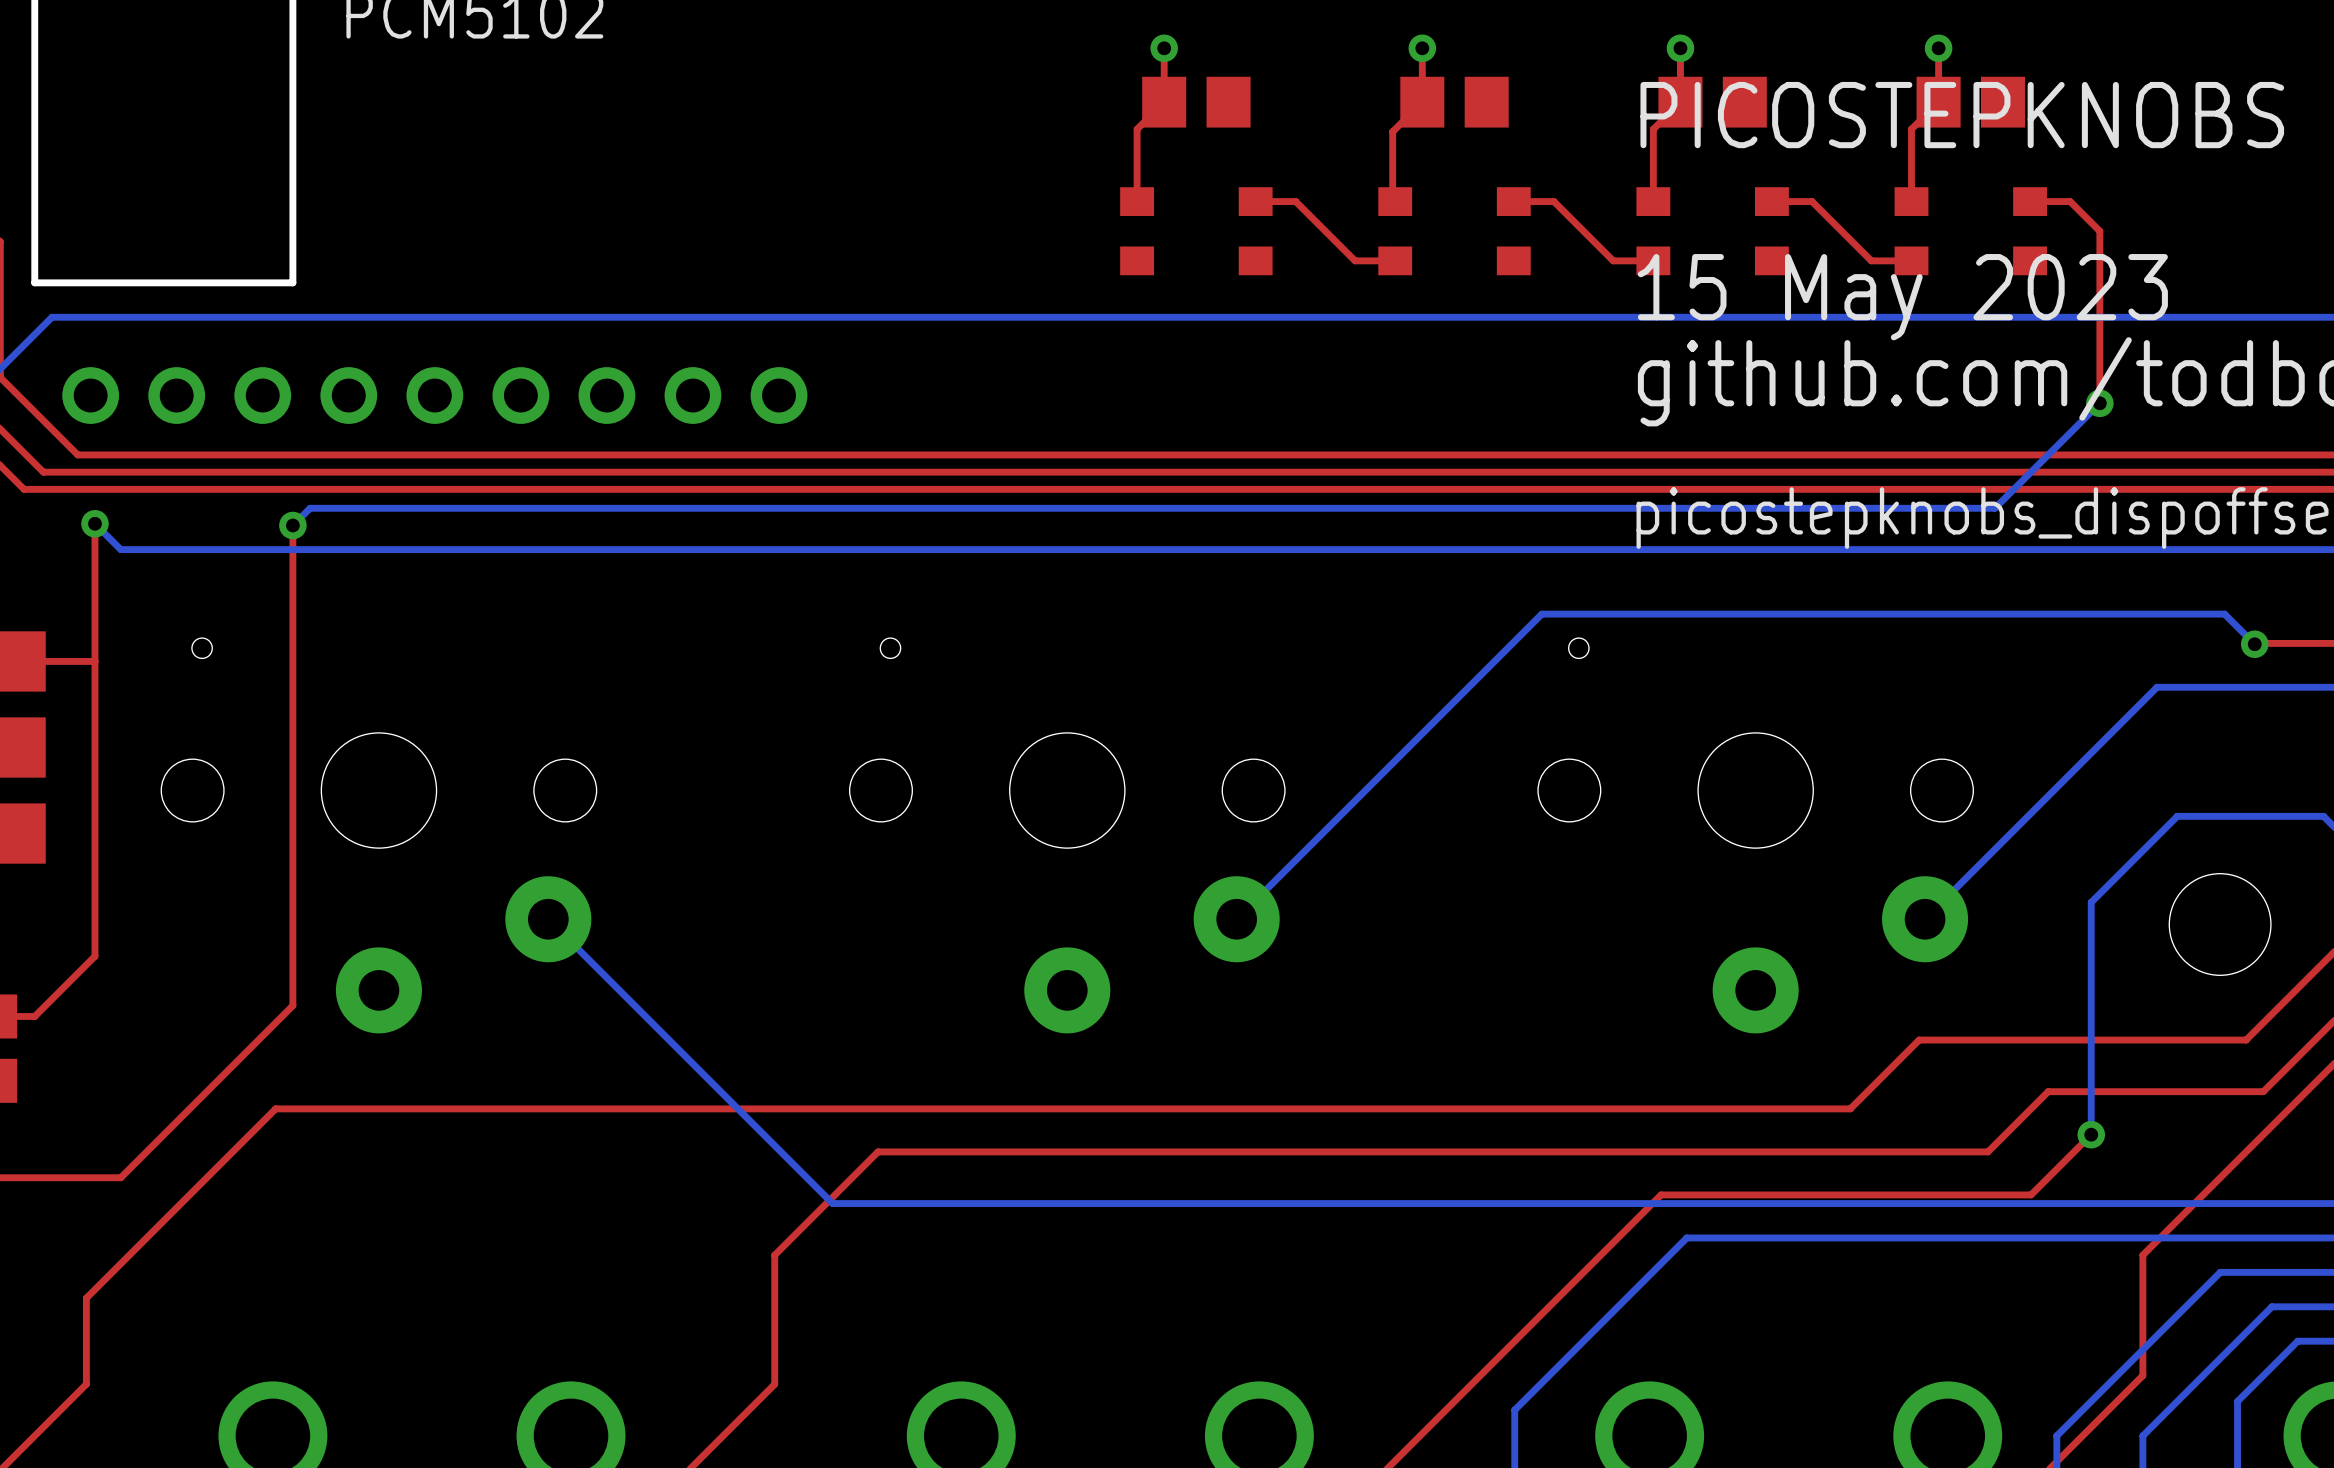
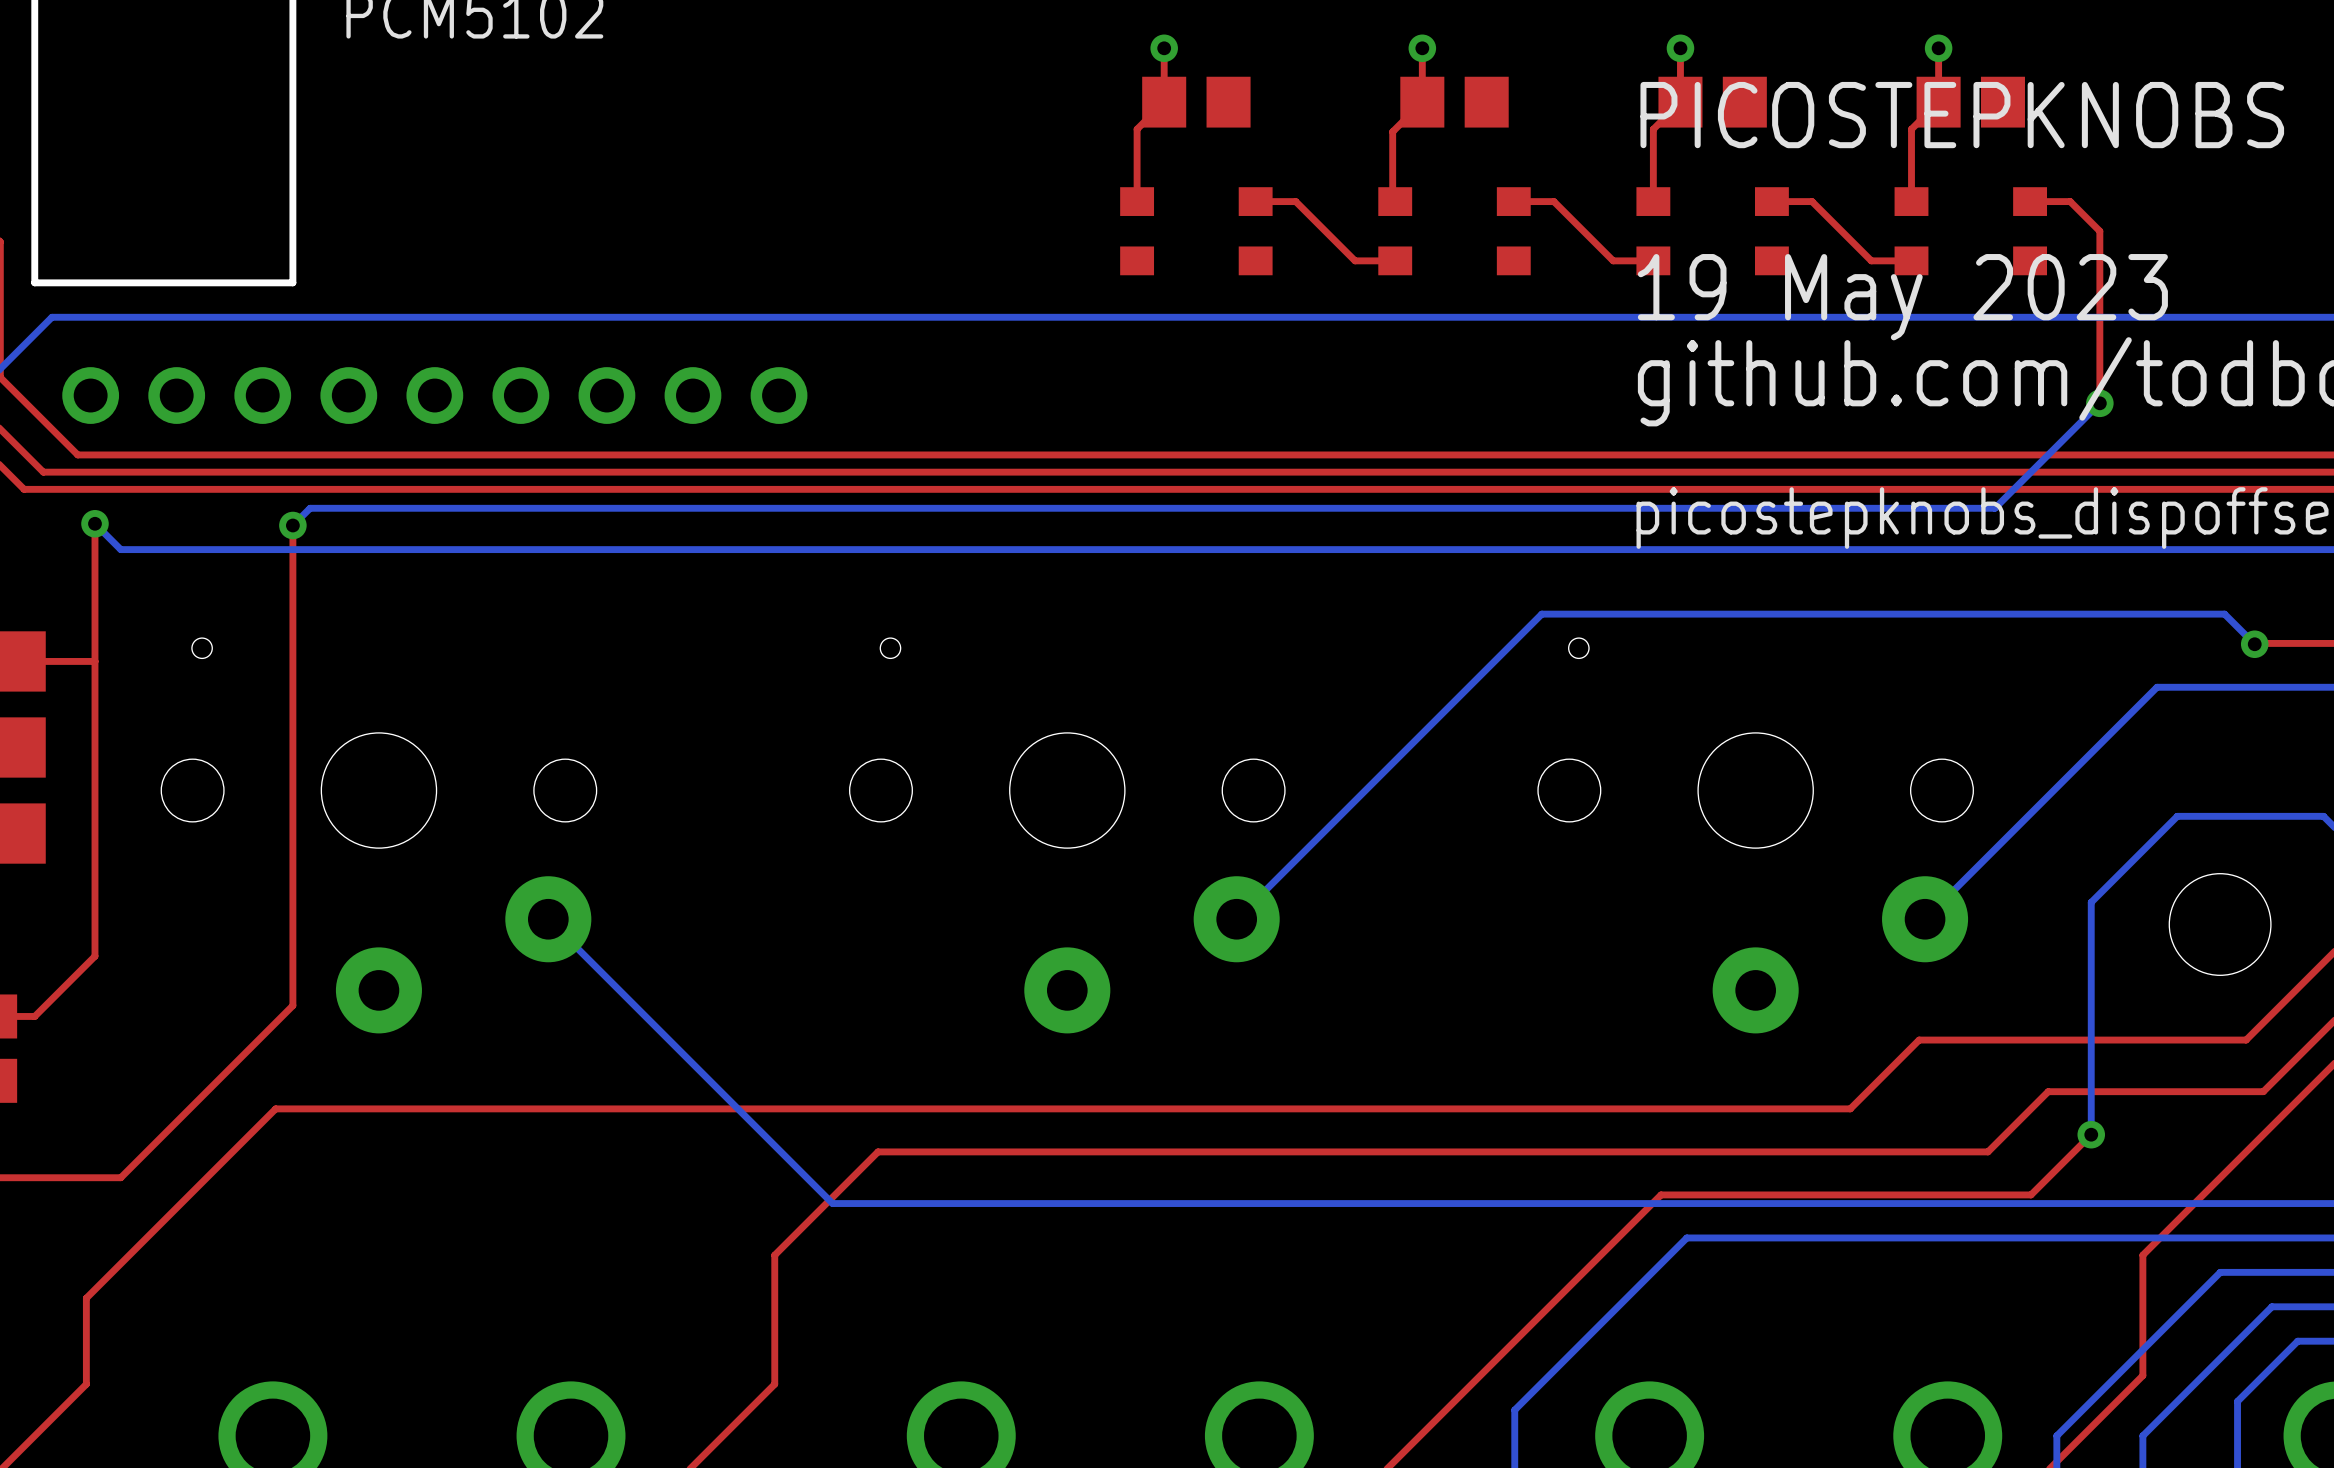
text: 15 May 2023 (1902, 297) -> 19 May 2023 (1902, 297)

